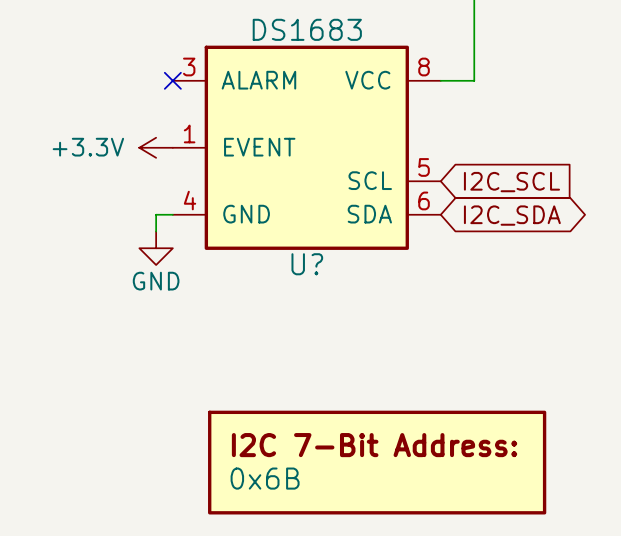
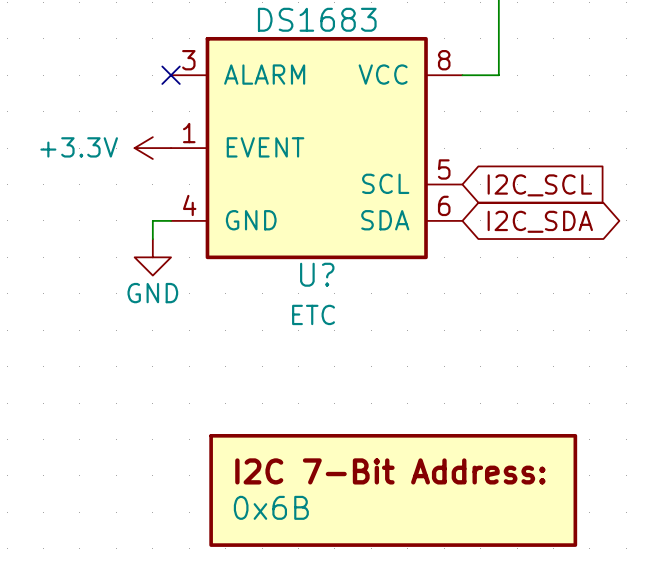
U? text: none -> ETC (313, 314)

